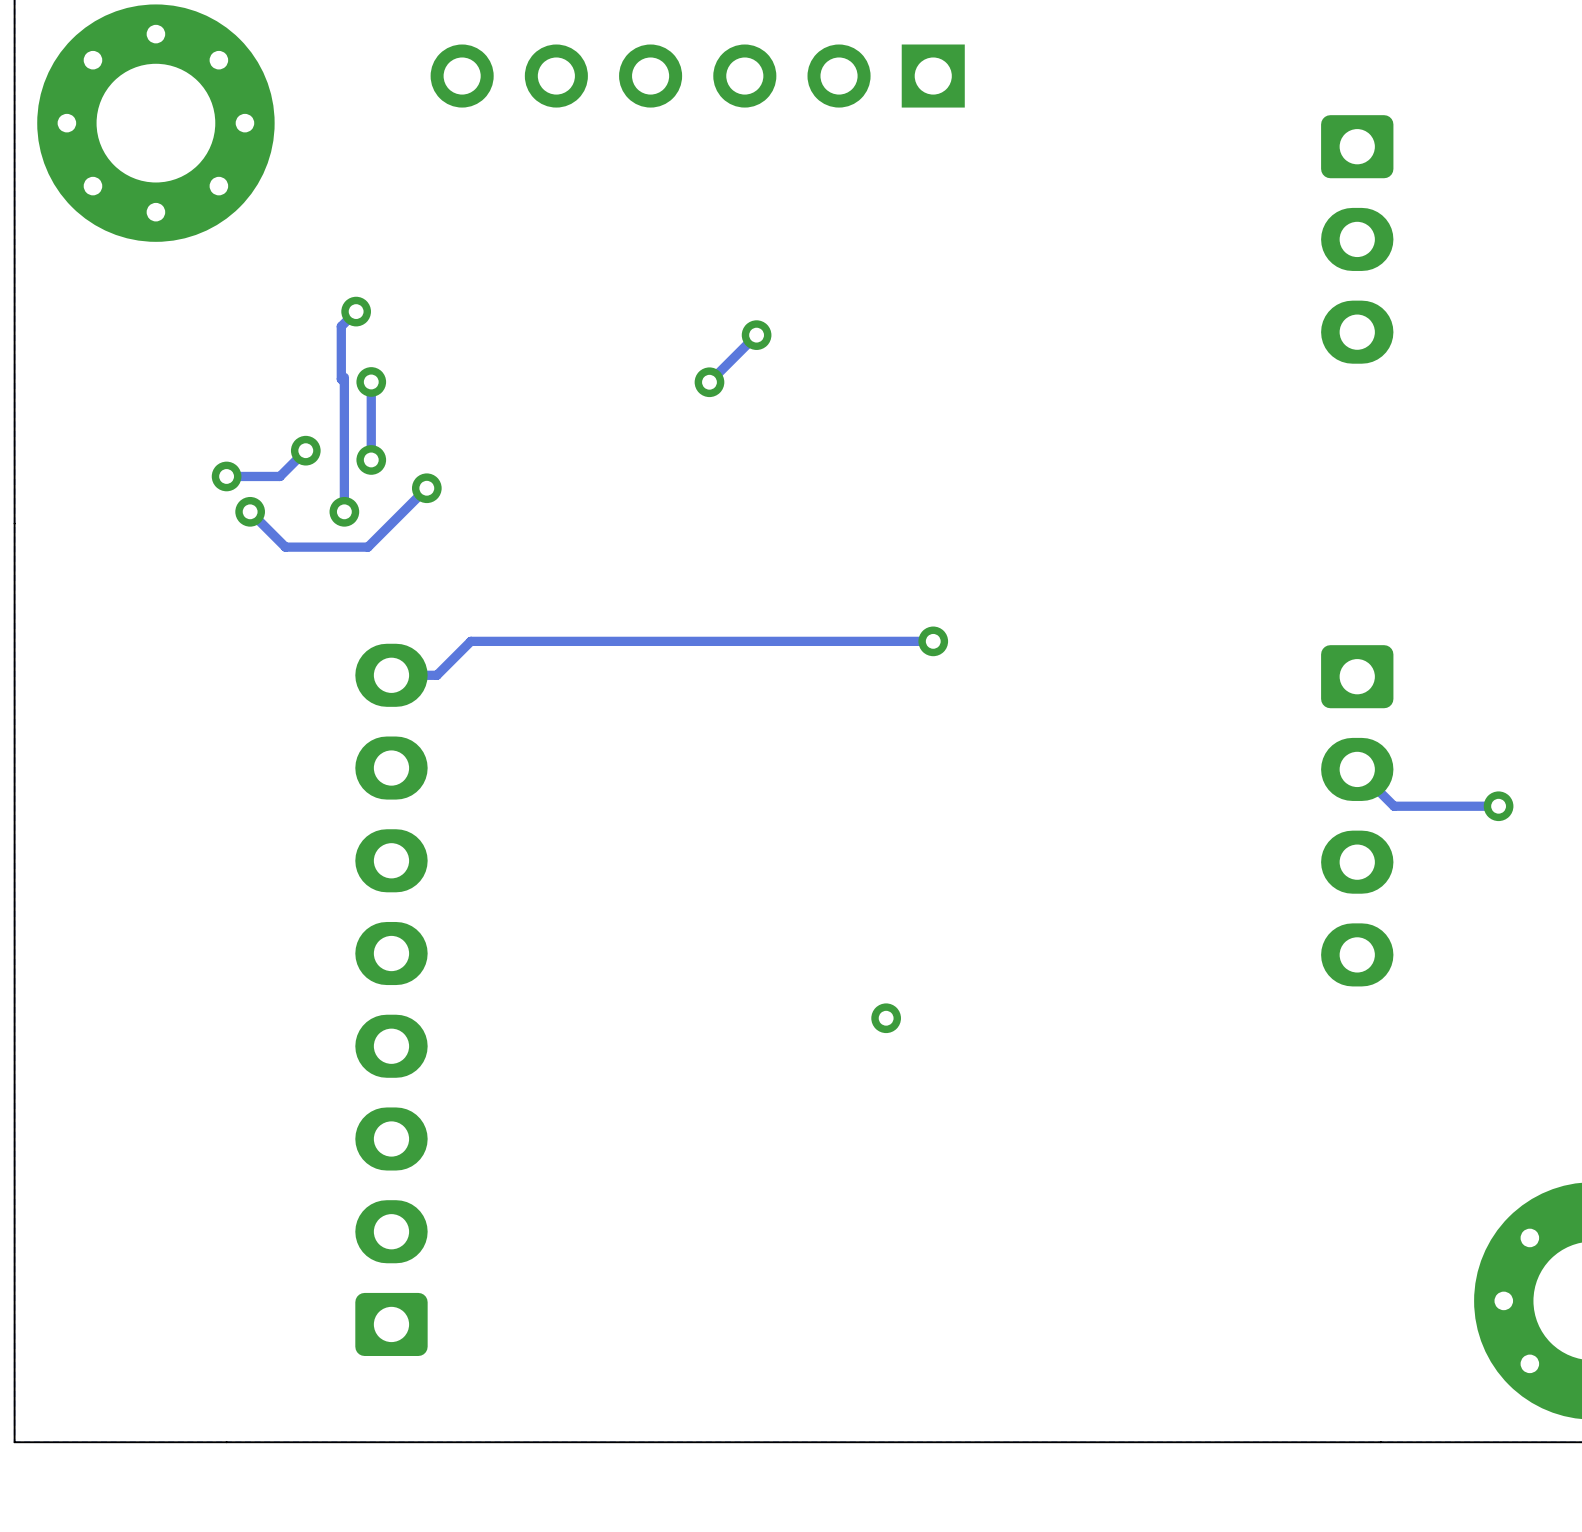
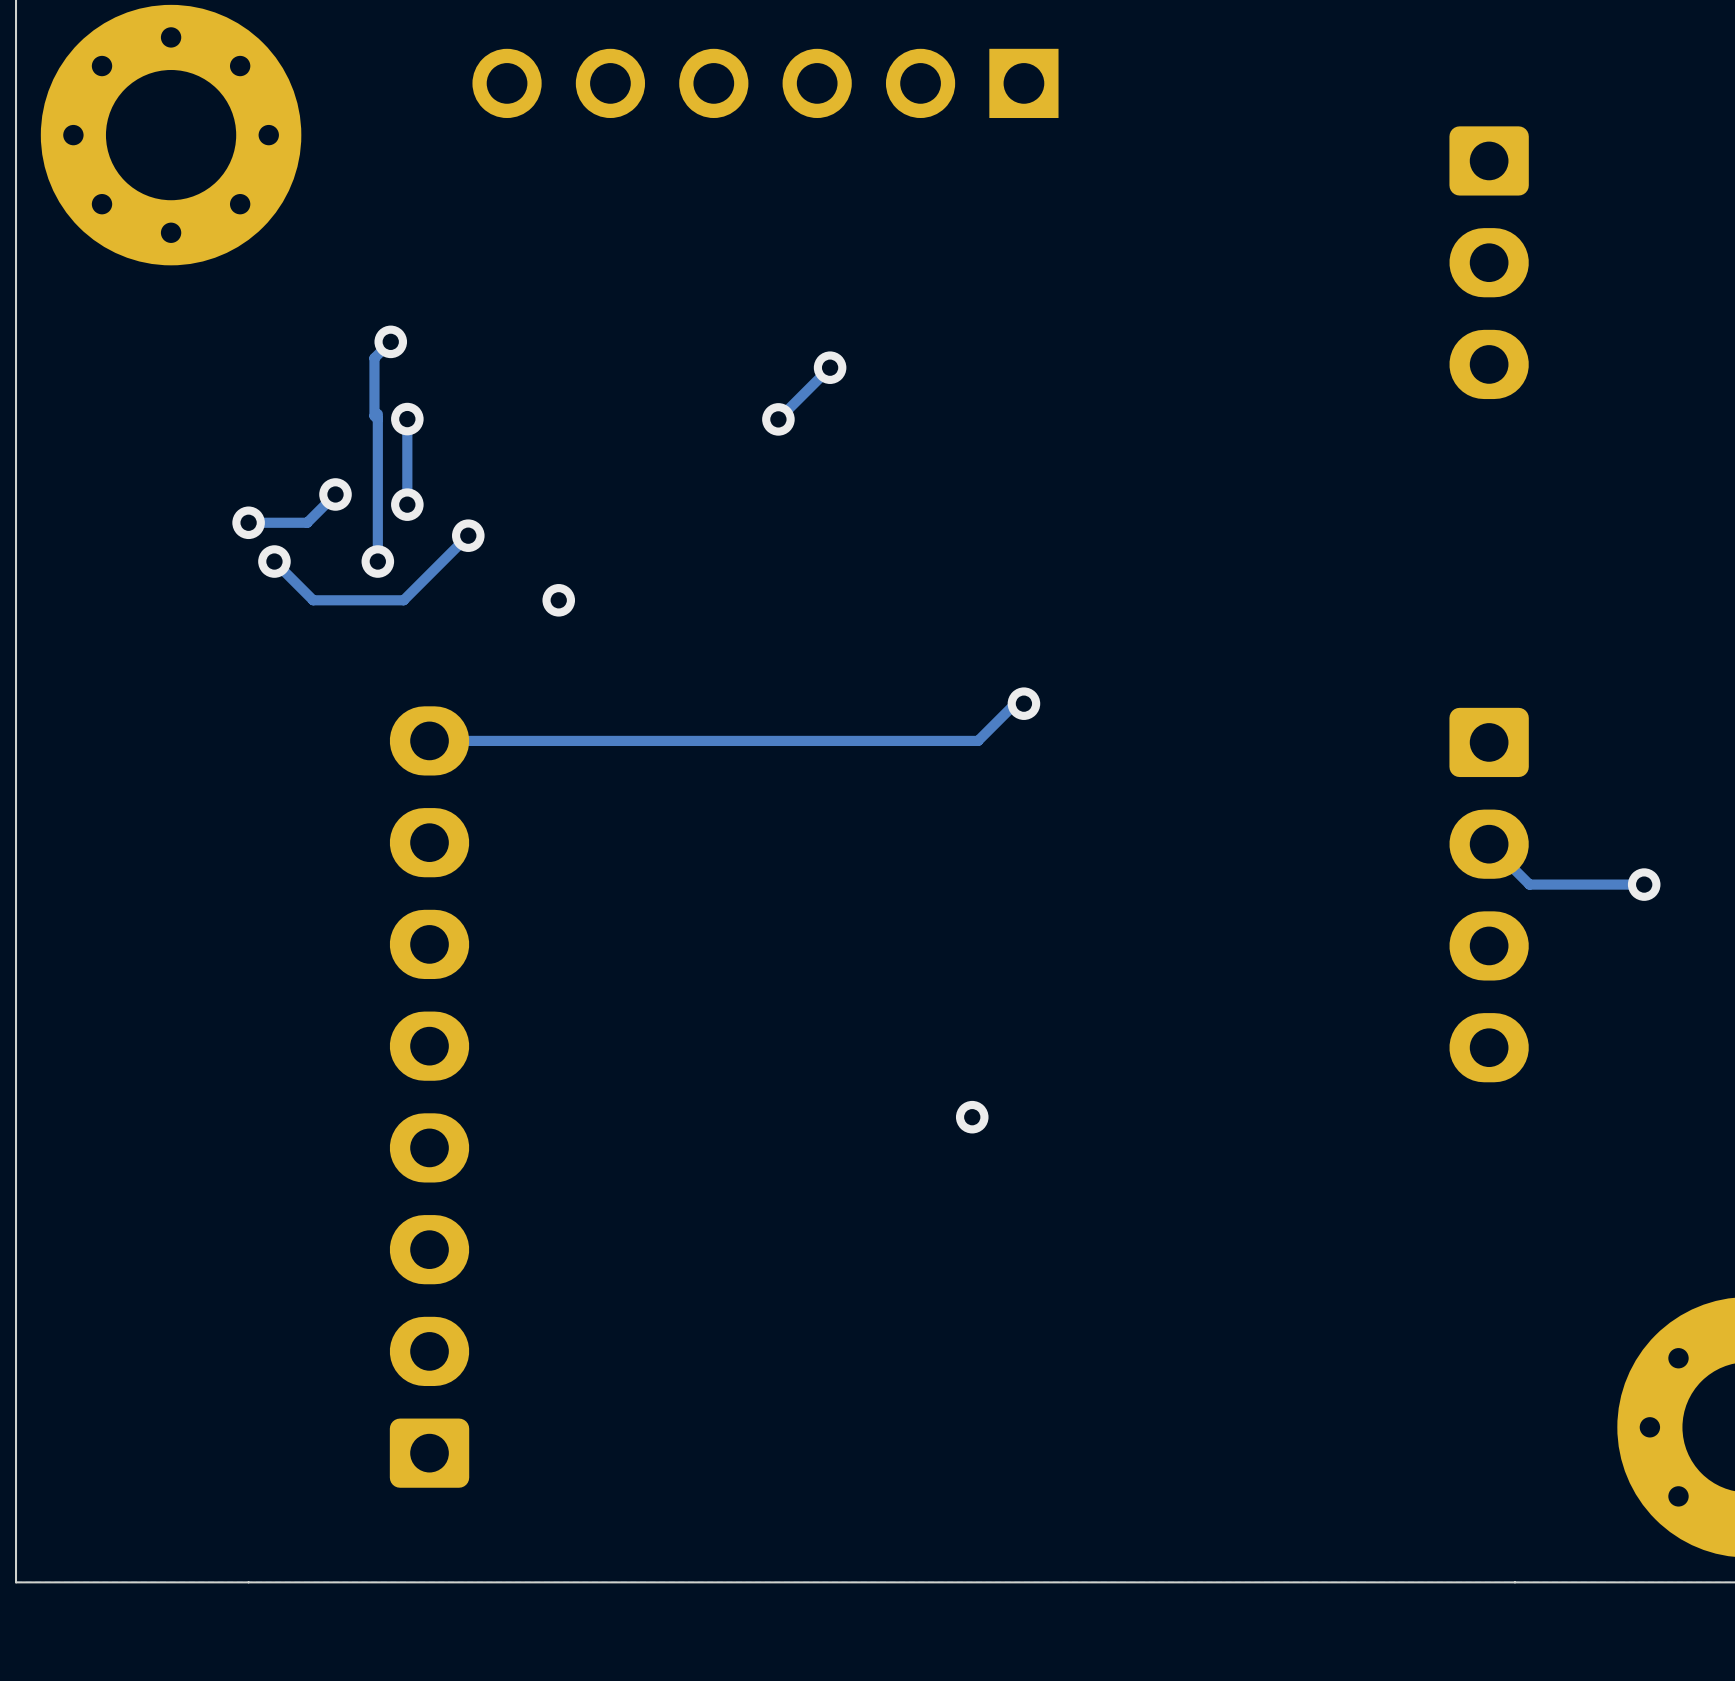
via: none -> (558, 600)
track: (933, 641) (470, 641) (436, 675) -> (1019, 699) (978, 740) (479, 740)

